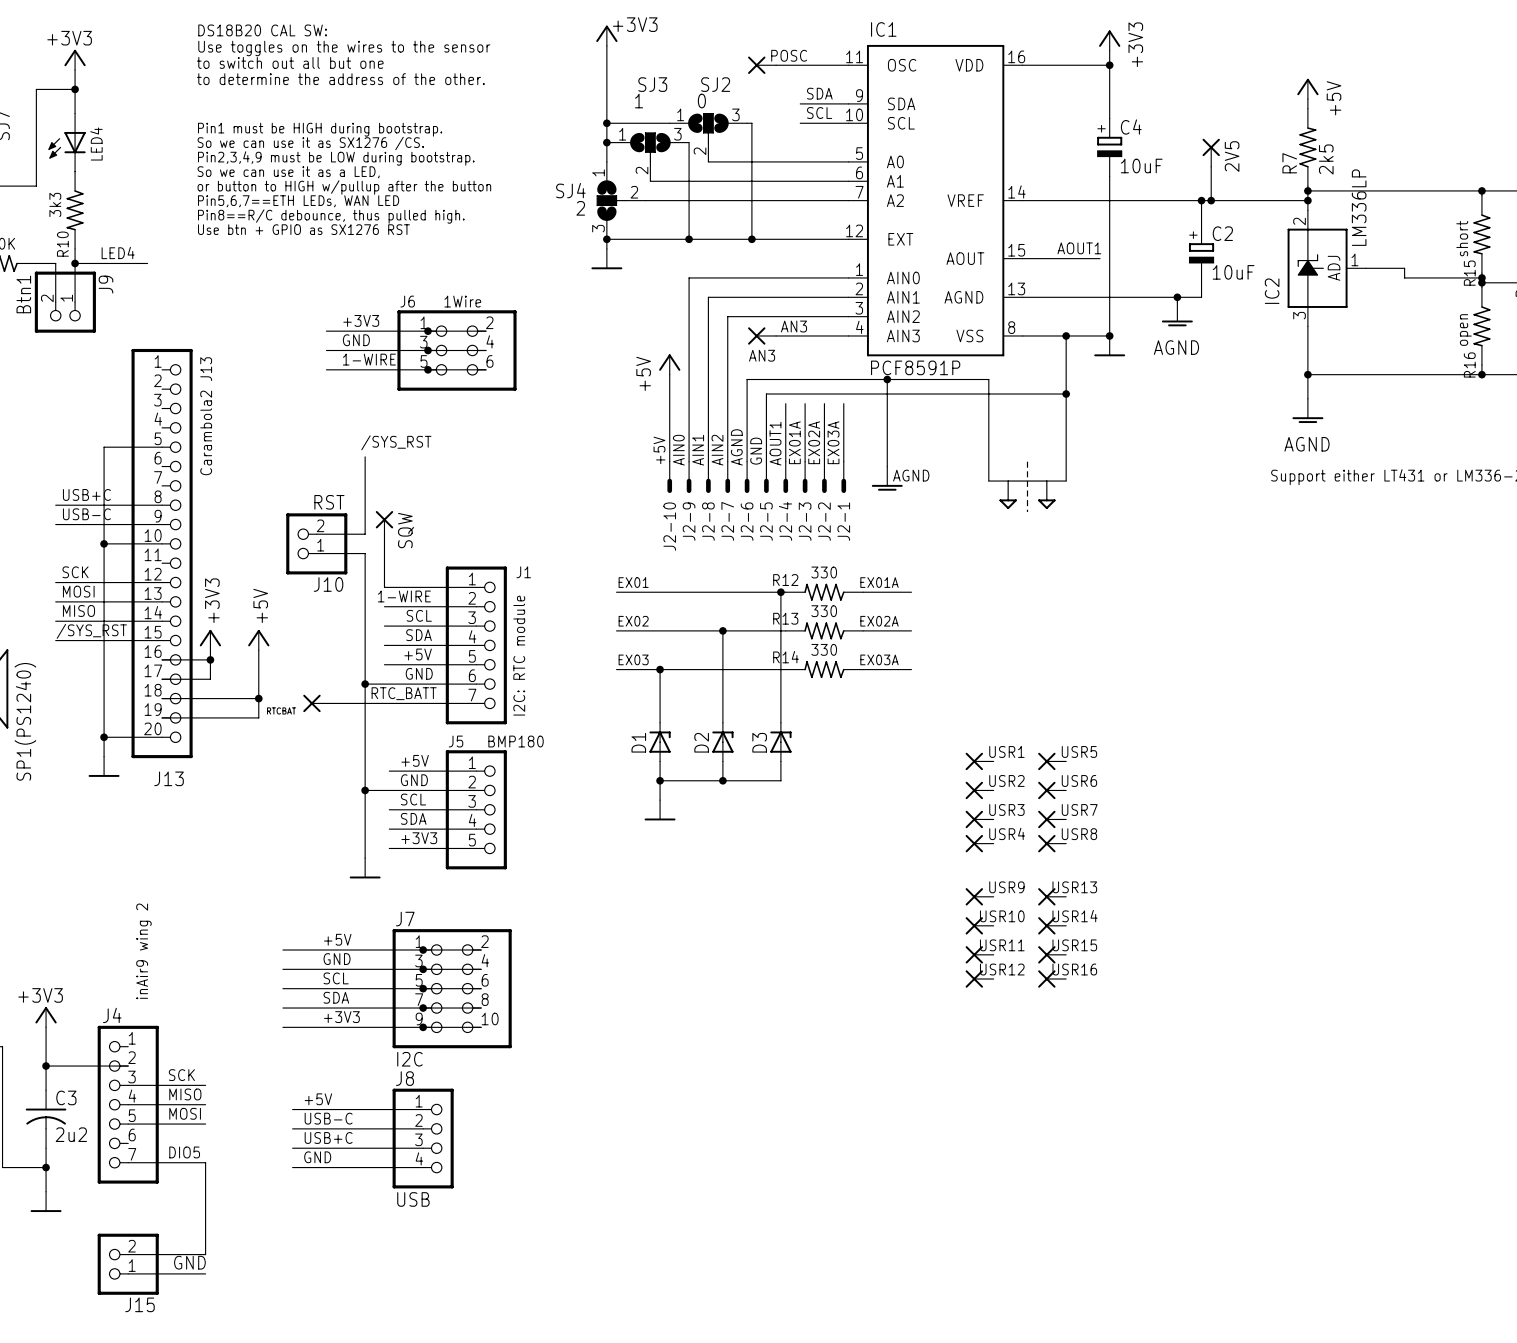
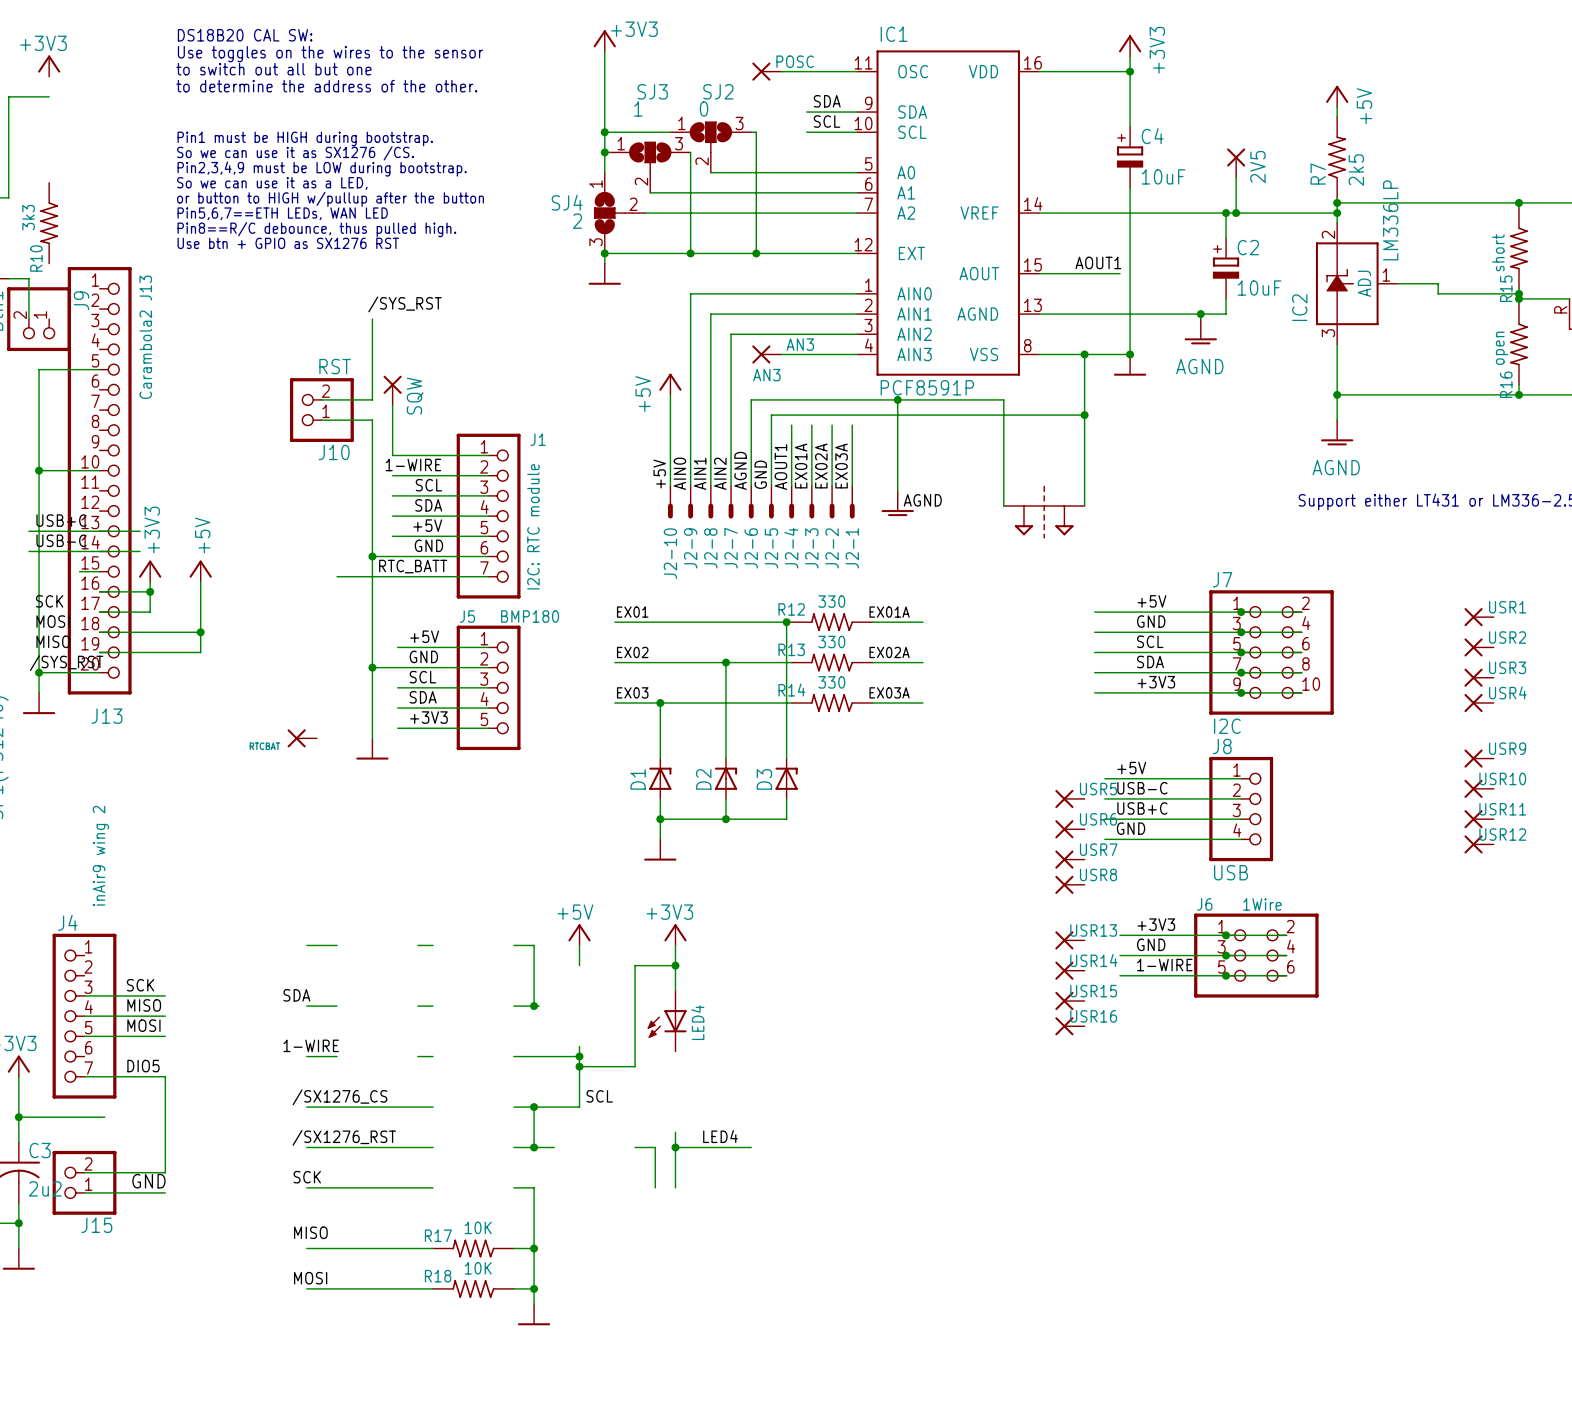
wire: (75, 70) (75, 113) -> none
junction: (75, 89) -> none
LED4 position: (67, 142) -> (667, 1021)
wire: (75, 248) (75, 302) -> none
label: LED4 (118, 252) -> none
wire: (75, 263) (147, 263) -> none
junction: (75, 263) -> none
label: +3V3 (361, 320) -> none
wire: (326, 331) (486, 331) -> none
junction: (427, 331) -> none
label: GND (356, 340) -> none
wire: none -> (99, 369) (39, 369) (39, 692)
wire: (326, 350) (486, 350) -> none
junction: (427, 350) -> none
J6 position: (456, 350) -> (1256, 955)
label: 1-WIRE (369, 359) -> none
wire: (326, 369) (486, 369) -> none
junction: (427, 369) -> none
wire: none -> (392, 404) (392, 455) (488, 455)
wire: none -> (321, 420) (372, 420) (372, 566)
label: none -> 1-WIRE (413, 464)
label position: /SYS_RST (396, 442) -> /SYS_RST (405, 304)
junction: none -> (39, 470)
wire: (104, 447) (104, 756) -> (79, 470) (39, 470)
wire: (123, 447) (162, 447) -> none
wire: (365, 456) (365, 534) (316, 534) -> (372, 319) (372, 399) (321, 399)
label: none -> SCL (428, 485)
label: none -> SDA (428, 505)
label: none -> +5V (427, 525)
label: none -> GND (428, 545)
SQW position: (384, 525) -> (392, 390)
junction: none -> (372, 556)
junction: (104, 543) -> none
wire: (123, 543) (162, 543) -> none
J10 position: (316, 543) -> (321, 410)
J13 position: (162, 553) -> (99, 480)
wire: none -> (150, 581) (150, 612) (140, 612)
wire: none -> (200, 581) (200, 652) (140, 652)
wire: (316, 553) (365, 553) (365, 858) -> none
junction: none -> (150, 591)
label: none -> +5V (1151, 601)
wire: (55, 582) (123, 582) -> none
wire: none -> (1094, 612) (1301, 612)
junction: none -> (1241, 612)
wire: (384, 587) (476, 587) -> (372, 617) (372, 738)
label: none -> GND (1151, 621)
label: 1-WIRE (404, 596) -> none
wire: (55, 601) (123, 601) -> none
junction: none -> (200, 632)
wire: none -> (1094, 632) (1301, 632)
junction: none -> (1241, 632)
wire: (384, 606) (476, 606) -> (392, 475) (488, 475)
label: none -> SCL (1150, 641)
label position: SCL (419, 615) -> SCL (422, 677)
wire: (55, 621) (123, 621) -> none
wire: none -> (1094, 652) (1301, 652)
junction: none -> (1241, 652)
wire: (384, 626) (476, 626) -> (392, 495) (488, 495)
label: none -> SDA (1150, 661)
junction: none -> (372, 667)
label position: SDA (419, 635) -> SDA (423, 697)
wire: (55, 640) (65, 640) -> none
junction: none -> (39, 672)
wire: (123, 640) (162, 640) -> none
power symbol position: +3V3 (210, 640) -> +3V3 (150, 571)
power symbol position: +5V (258, 640) -> +5V (200, 571)
wire: none -> (1094, 672) (1301, 672)
junction: none -> (1241, 672)
wire: (384, 645) (476, 645) -> (392, 516) (488, 516)
J1 position: (476, 645) -> (488, 516)
label: none -> +3V3 (1156, 682)
wire: (210, 650) (210, 679) (162, 679) -> none
wire: (258, 650) (258, 717) (162, 717) -> none
label position: +5V (418, 654) -> +5V (424, 636)
wire: (162, 659) (210, 659) -> (99, 591) (150, 591)
junction: (210, 659) -> none
wire: none -> (1094, 692) (1301, 692)
junction: none -> (1241, 692)
wire: (384, 664) (476, 664) -> (392, 536) (488, 536)
label position: GND (419, 673) -> GND (423, 656)
wire: (365, 684) (476, 684) -> (372, 556) (488, 556)
junction: (365, 684) -> none
label position: RTC_BATT (404, 693) -> RTC_BATT (413, 566)
wire: (162, 698) (258, 698) -> none
junction: (258, 698) -> none
wire: (331, 703) (476, 703) -> (337, 576) (488, 576)
power symbol: none -> (372, 748)
label: none -> +5V (1131, 768)
wire: (104, 737) (162, 737) -> (140, 632) (200, 632)
junction: (104, 737) -> none
wire: none -> (1104, 778) (1241, 778)
label: none -> USB-C (1142, 788)
label: +5V (415, 760) -> none
USR1 position: (979, 761) -> (1479, 617)
wire: none -> (1104, 798) (1241, 798)
power symbol position: (104, 766) -> (39, 703)
label: none -> USB+C (1142, 808)
wire: (389, 771) (476, 771) -> (397, 647) (488, 647)
label: GND (414, 780) -> none
wire: none -> (1104, 819) (1241, 819)
label: none -> GND (1131, 828)
wire: (365, 790) (476, 790) -> (372, 667) (488, 667)
junction: (365, 790) -> none
USR2 position: (979, 790) -> (1479, 647)
label: SCL (413, 799) -> none
wire: none -> (1104, 839) (1241, 839)
wire: (389, 809) (476, 809) -> (397, 687) (488, 687)
J5 position: (476, 809) -> (488, 687)
label: SDA (413, 818) -> none
USR3 position: (979, 819) -> (1479, 677)
wire: (389, 829) (476, 829) -> (397, 708) (488, 708)
label position: +3V3 (419, 838) -> +3V3 (428, 717)
USR4 position: (979, 843) -> (1479, 703)
wire: (389, 848) (476, 848) -> (397, 728) (488, 728)
power symbol: (365, 868) -> none
label: none -> +3V3 (1156, 924)
power symbol: none -> +5V (579, 934)
power symbol: none -> +3V3 (675, 934)
wire: none -> (1119, 935) (1286, 935)
junction: none -> (1226, 935)
USR9 position: (979, 896) -> (1479, 758)
wire: none -> (306, 945) (337, 945)
wire: none -> (417, 945) (433, 945)
wire: none -> (513, 945) (534, 945) (534, 1006)
wire: none -> (579, 945) (579, 965)
wire: none -> (675, 945) (675, 990)
label: none -> GND (1151, 944)
wire: none -> (1119, 955) (1286, 955)
junction: none -> (1226, 955)
wire: none -> (675, 965) (635, 965) (635, 1066) (579, 1066)
junction: none -> (675, 965)
label: none -> 1-WIRE (1164, 965)
USR10 position: (979, 925) -> (1479, 788)
wire: none -> (1119, 975) (1286, 975)
junction: none -> (1226, 975)
label: none -> SCK (140, 985)
label: +5V (337, 939) -> none
wire: (282, 949) (481, 949) -> none
junction: (423, 949) -> none
USR11 position: (979, 954) -> (1479, 819)
label: none -> MISO (144, 1005)
wire: none -> (306, 1006) (337, 1006)
label: GND (337, 959) -> none
wire: none -> (417, 1006) (433, 1006)
wire: none -> (513, 1006) (539, 1006)
junction: none -> (534, 1006)
wire: (282, 969) (481, 969) -> none
junction: (423, 969) -> none
label: none -> MOSI (143, 1025)
label: SCL (336, 978) -> none
USR12 position: (979, 979) -> (1479, 844)
wire: (282, 988) (481, 988) -> none
junction: (423, 988) -> none
J7 position: (452, 988) -> (1271, 652)
label: none -> 1-WIRE (311, 1045)
label position: SDA (336, 997) -> SDA (296, 995)
wire: none -> (579, 1046) (579, 1107) (513, 1107)
wire: (282, 1008) (321, 1008) -> none
wire: (350, 1008) (427, 1008) -> none
junction: (423, 1008) -> none
wire: (442, 1008) (481, 1008) -> (513, 1147) (554, 1147)
wire: none -> (513, 1056) (579, 1056)
junction: none -> (579, 1056)
label: +3V3 (341, 1017) -> none
junction: none -> (579, 1066)
wire: (282, 1027) (481, 1027) -> none
junction: (423, 1027) -> none
label: none -> SCL (599, 1096)
label: none -> /SX1276_CS (339, 1097)
wire: none -> (306, 1107) (433, 1107)
wire: none -> (534, 1107) (534, 1147)
junction: none -> (534, 1107)
label: SCK (181, 1075) -> none
wire: none -> (675, 1132) (675, 1187)
label: none -> LED4 (720, 1136)
wire: (128, 1085) (205, 1085) -> (84, 995) (165, 995)
label: none -> /SX1276_RST (344, 1137)
label: MISO (185, 1094) -> none
wire: none -> (306, 1147) (433, 1147)
junction: none -> (534, 1147)
wire: none -> (635, 1147) (655, 1147) (655, 1187)
wire: none -> (675, 1147) (751, 1147)
junction: none -> (675, 1147)
label: +5V (318, 1099) -> none
wire: (128, 1104) (205, 1104) -> (84, 1016) (165, 1016)
J4 position: (128, 1104) -> (84, 1016)
wire: (292, 1109) (423, 1109) -> none
label: MOSI (185, 1113) -> none
label: USB-C (328, 1118) -> SCK (307, 1177)
wire: (128, 1124) (205, 1124) -> (84, 1036) (165, 1036)
label: none -> GND (148, 1181)
wire: (292, 1128) (423, 1128) -> none
wire: none -> (306, 1187) (433, 1187)
wire: none -> (513, 1187) (534, 1187) (534, 1304)
label: USB+C (328, 1137) -> none
J8 position: (423, 1138) -> (1241, 809)
wire: (292, 1148) (423, 1148) -> none
label position: DIO5 (184, 1152) -> DIO5 (143, 1066)
label: GND (317, 1157) -> none
wire: (128, 1162) (205, 1162) (205, 1254) (128, 1254) -> (84, 1076) (165, 1076) (165, 1172) (84, 1172)
wire: (292, 1167) (423, 1167) -> none
label: none -> MISO (310, 1232)
wire: none -> (306, 1248) (433, 1248)
R17: none -> 10K (473, 1248)
wire: none -> (513, 1248) (534, 1248)
junction: none -> (534, 1248)
label: none -> MOSI (310, 1278)
wire: none -> (306, 1288) (433, 1288)
R18: none -> 10K (473, 1288)
wire: none -> (513, 1288) (534, 1288)
junction: none -> (534, 1288)
power symbol: none -> (534, 1314)
label: GND (189, 1262) -> none
J15 position: (128, 1264) -> (84, 1182)
wire: (128, 1273) (205, 1273) -> (84, 1192) (165, 1192)

